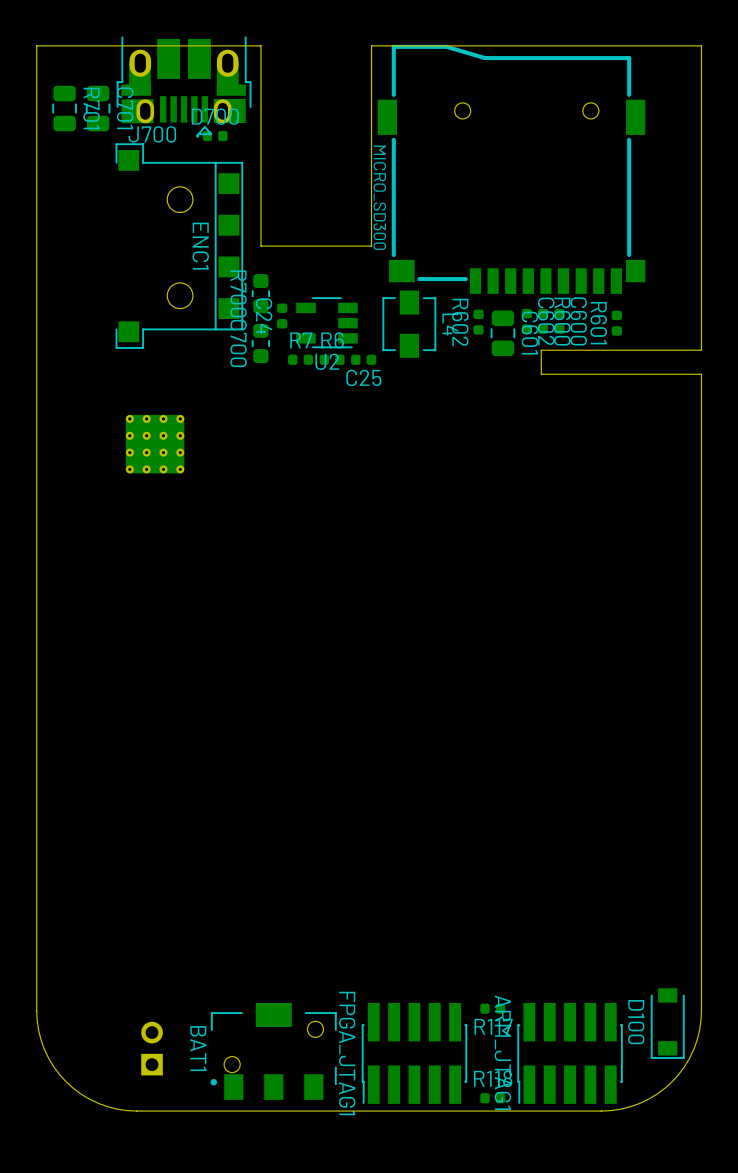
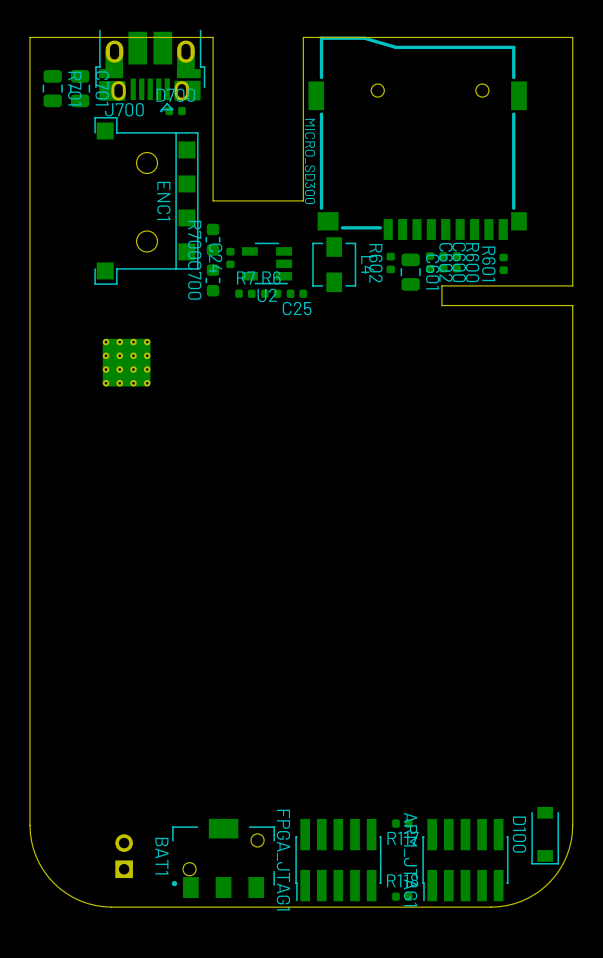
R600 name: R600 (562, 321) -> C600 (459, 262)
C600 name: C600 (578, 321) -> R600 (472, 262)

